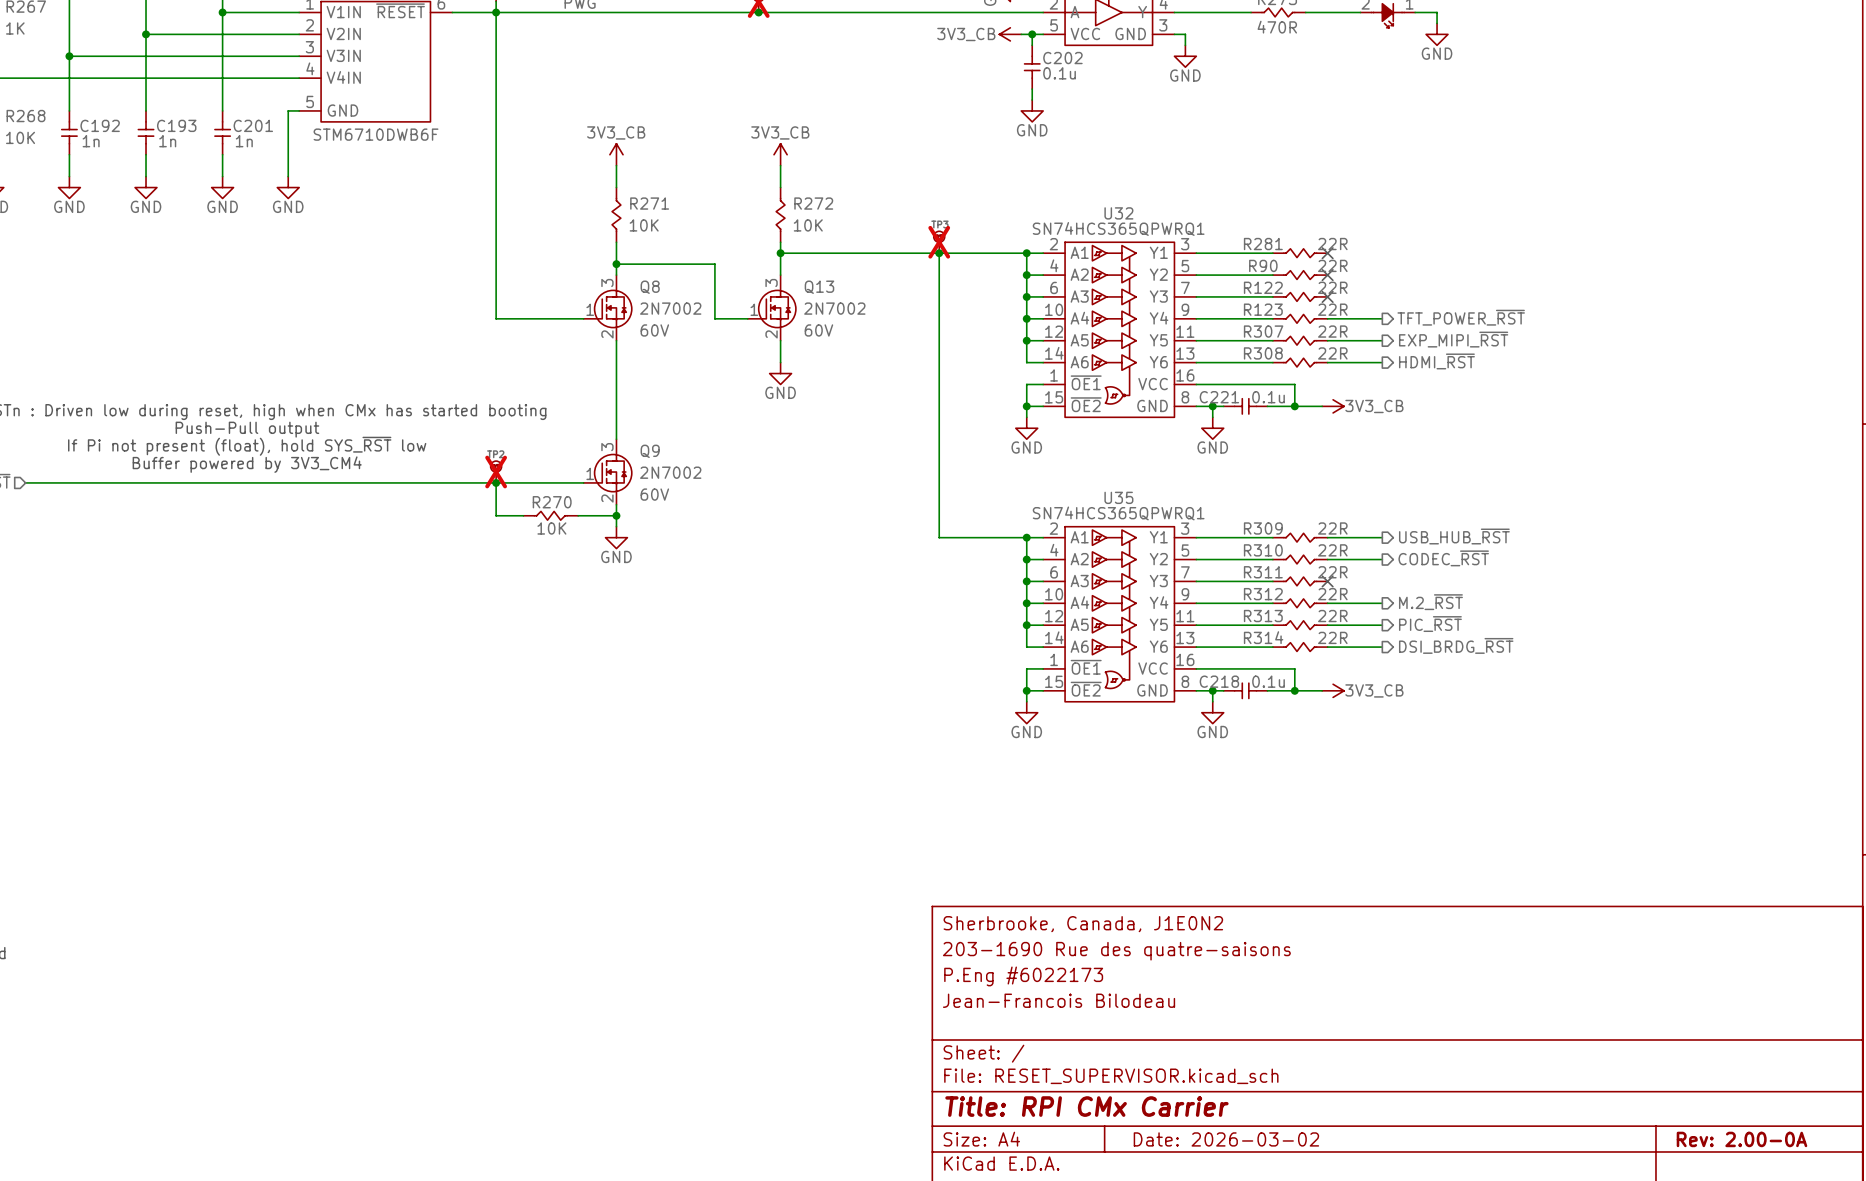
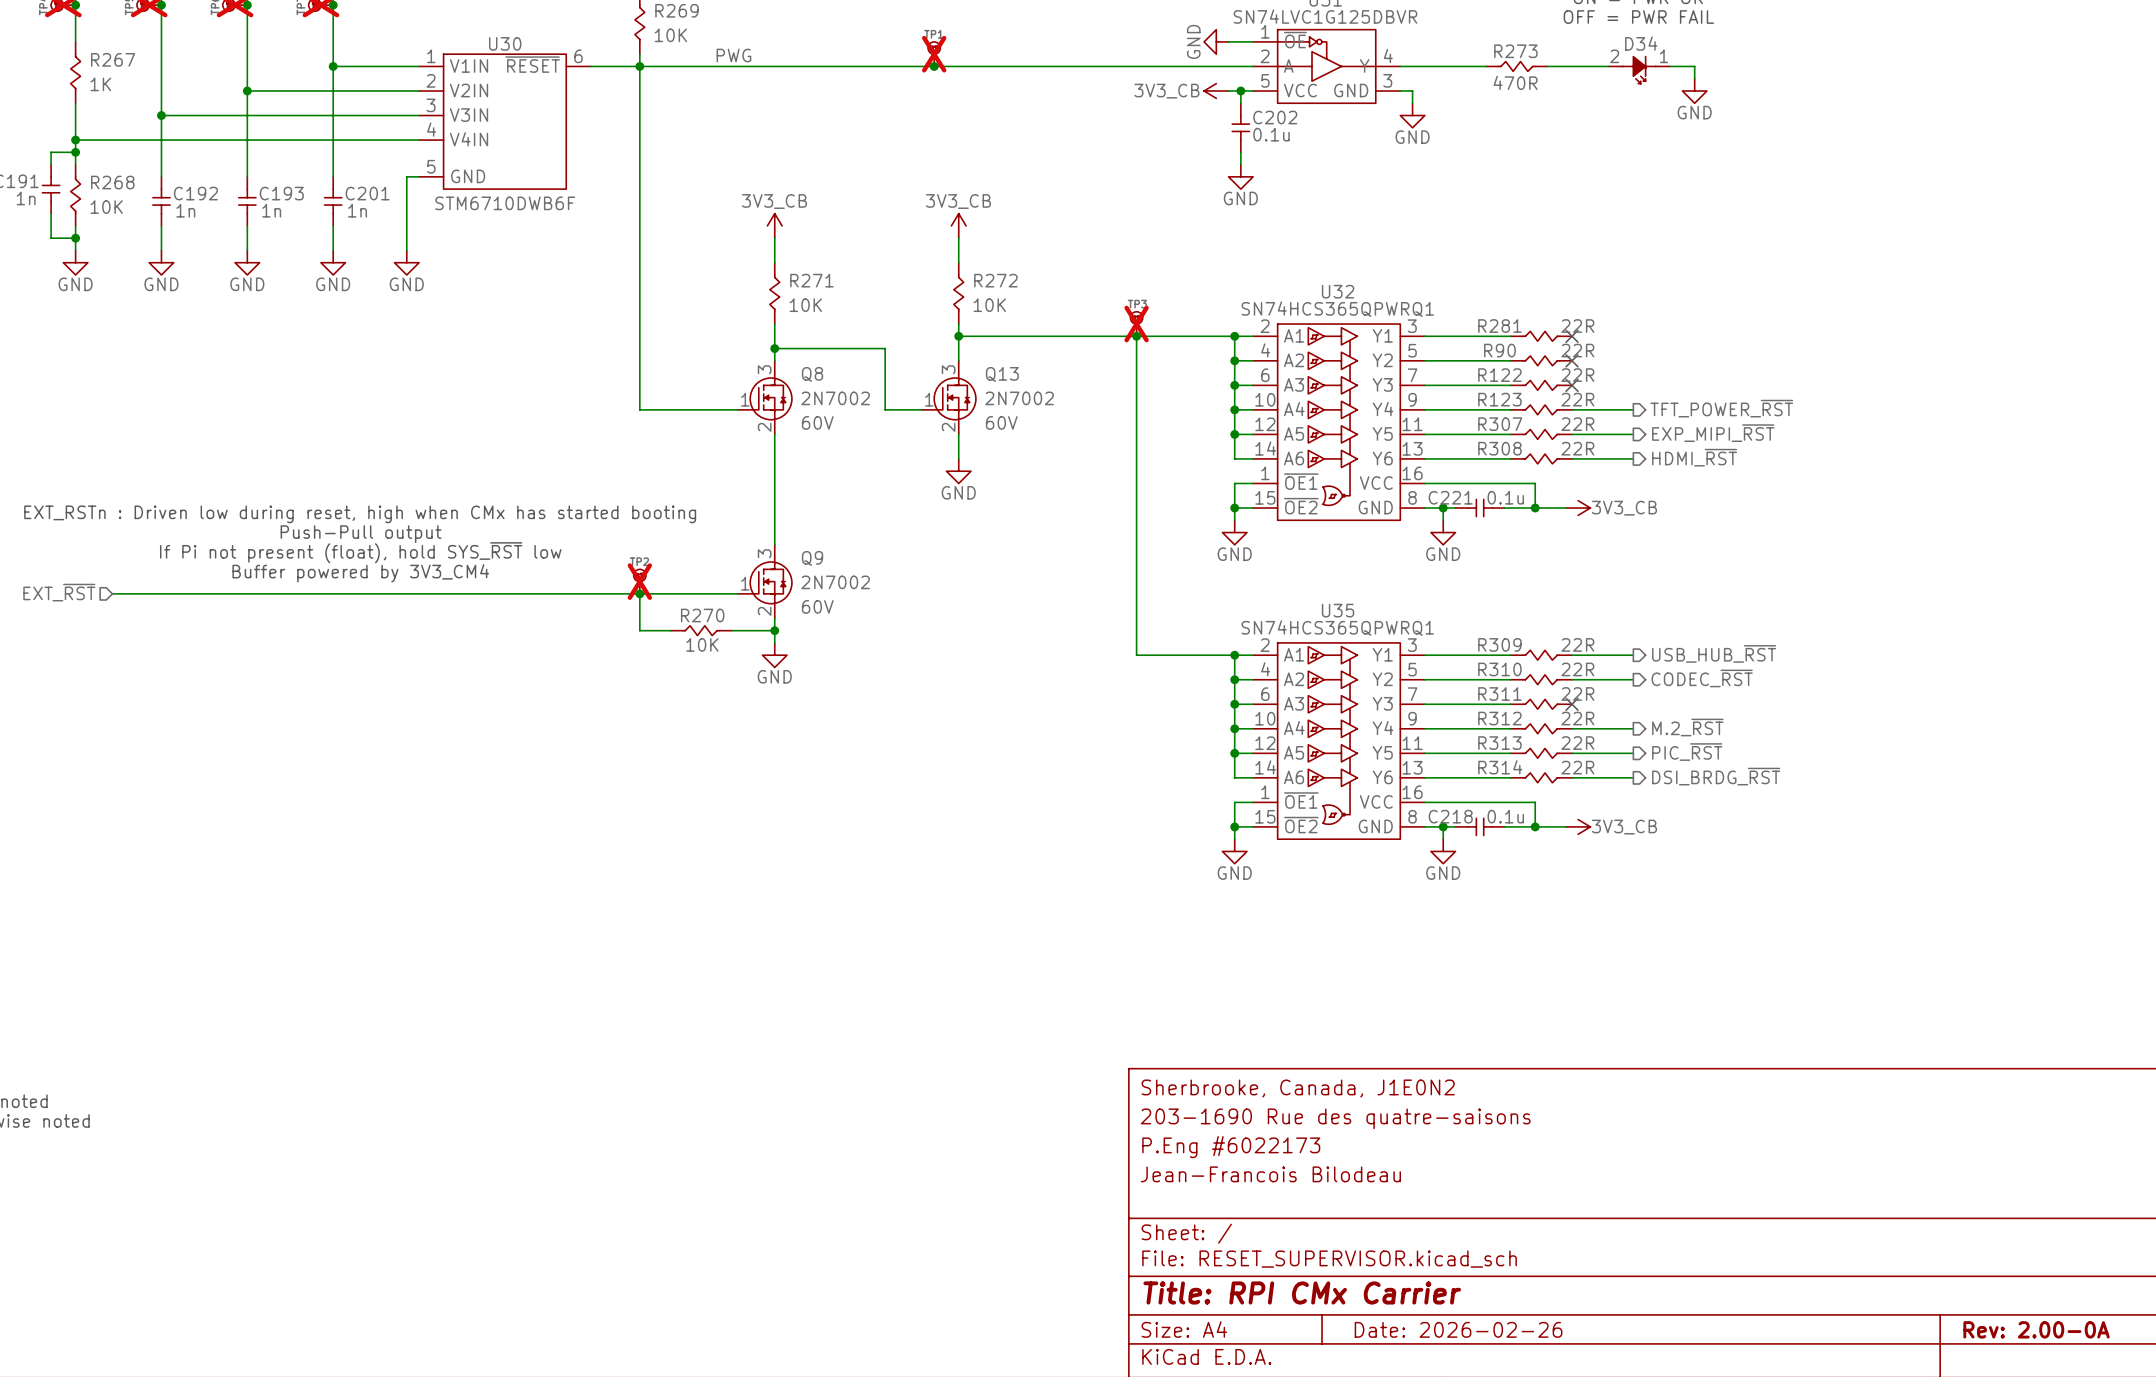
title block: Date: 2026-03-02 (1226, 1139) -> Date: 2026-02-26 (1458, 1329)

